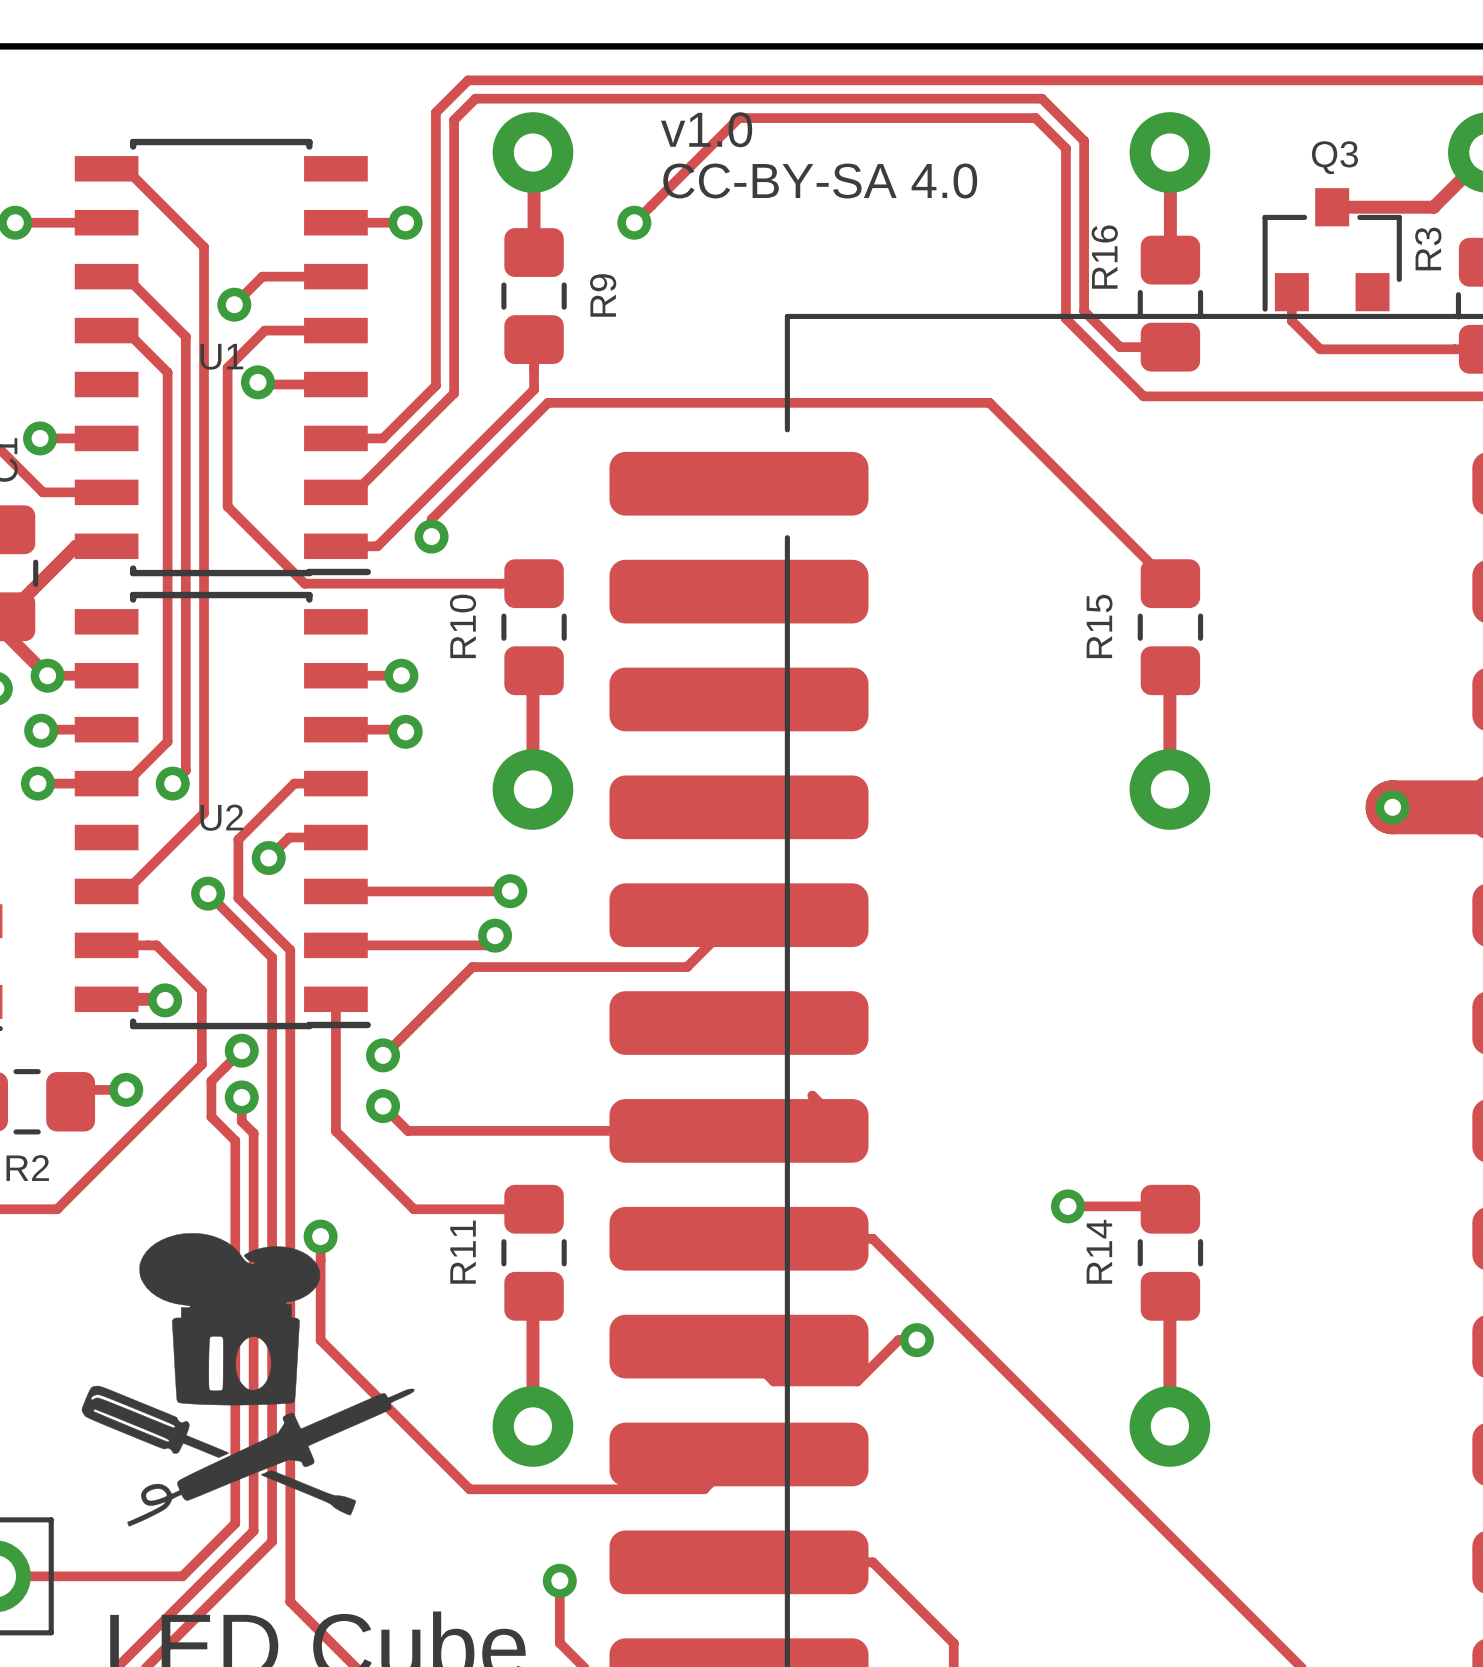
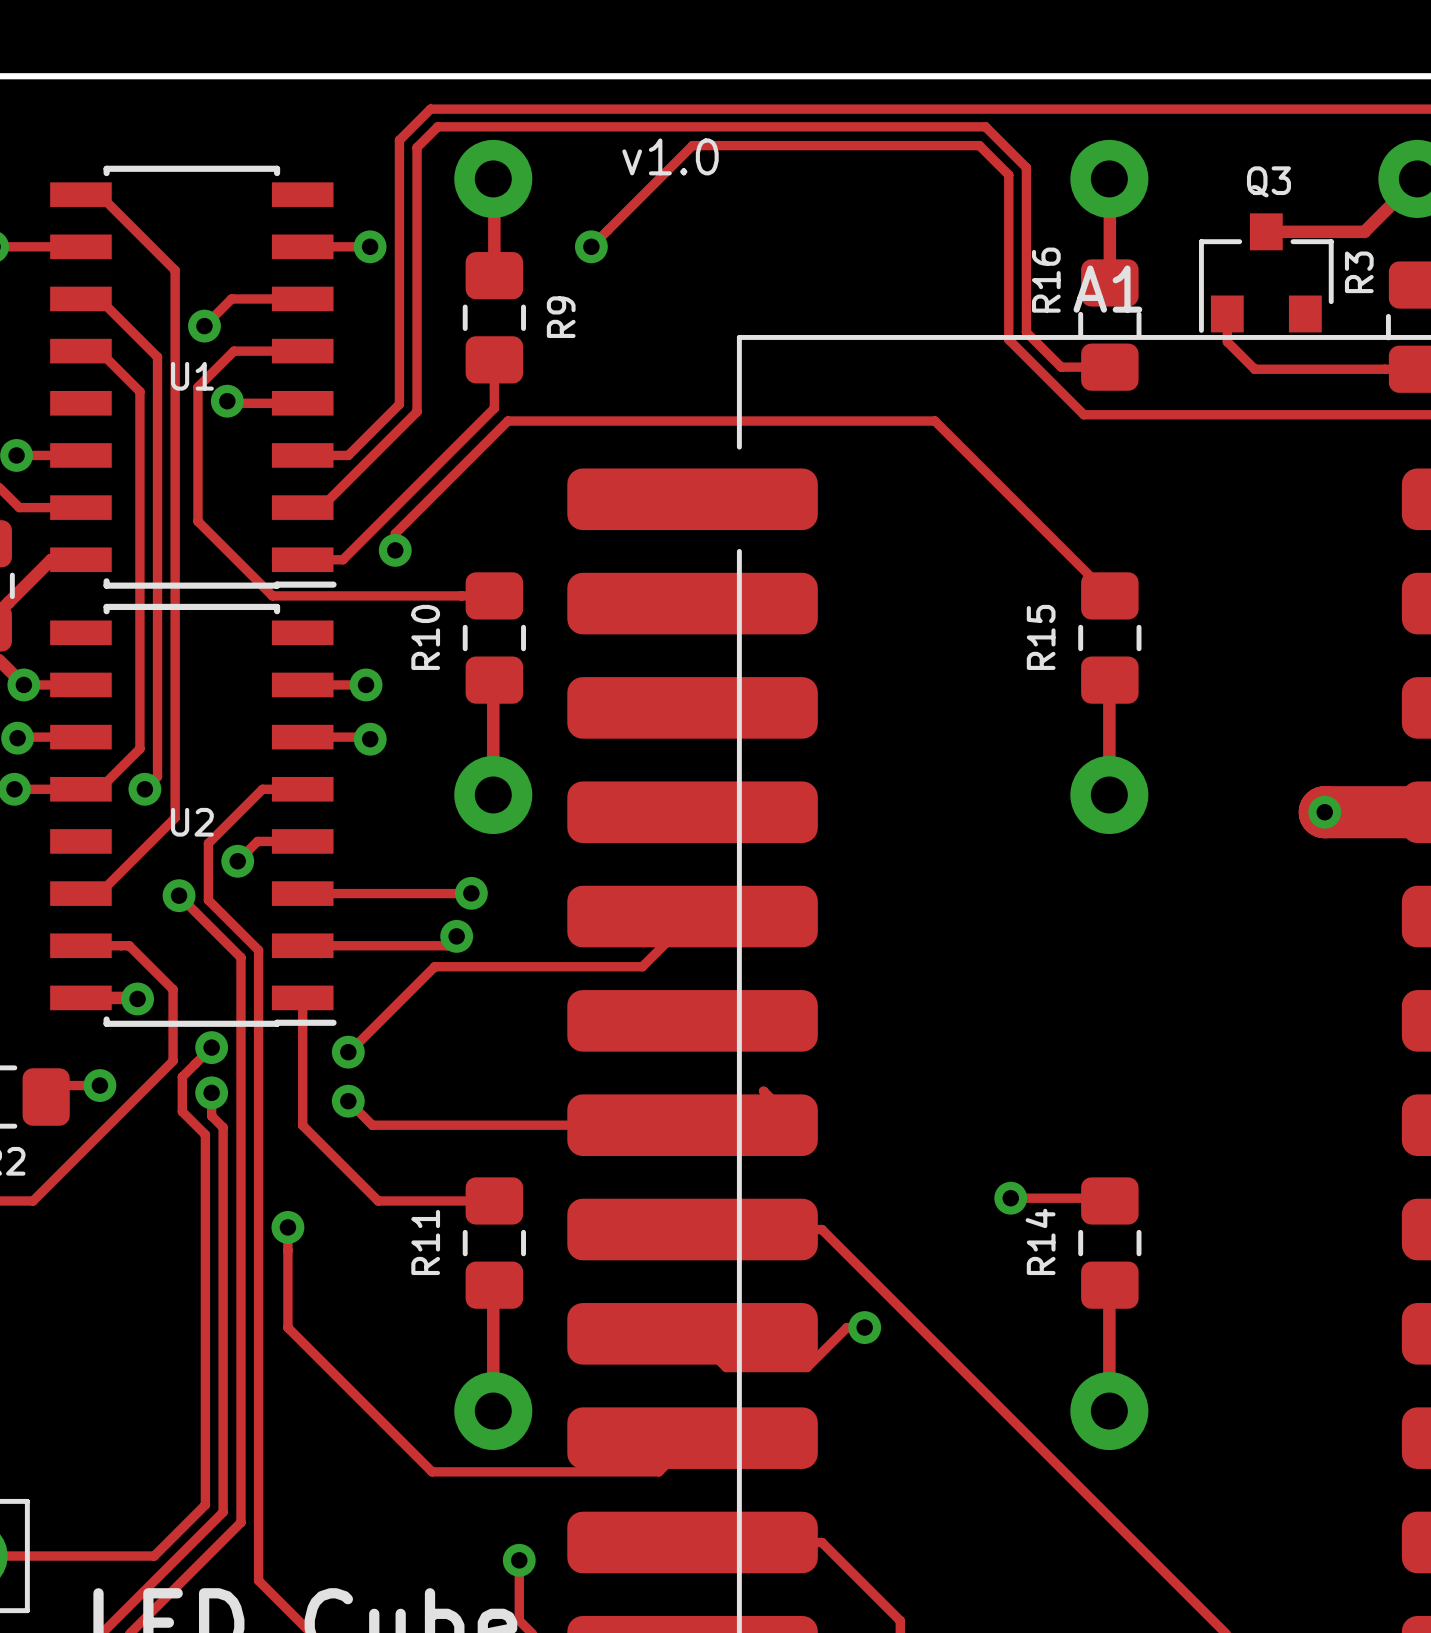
text: CC-BY-SA 4.0 (820, 181) -> none
A1 name: none -> A1 (1107, 289)
drawing: [81, 1233, 415, 1527] -> none

